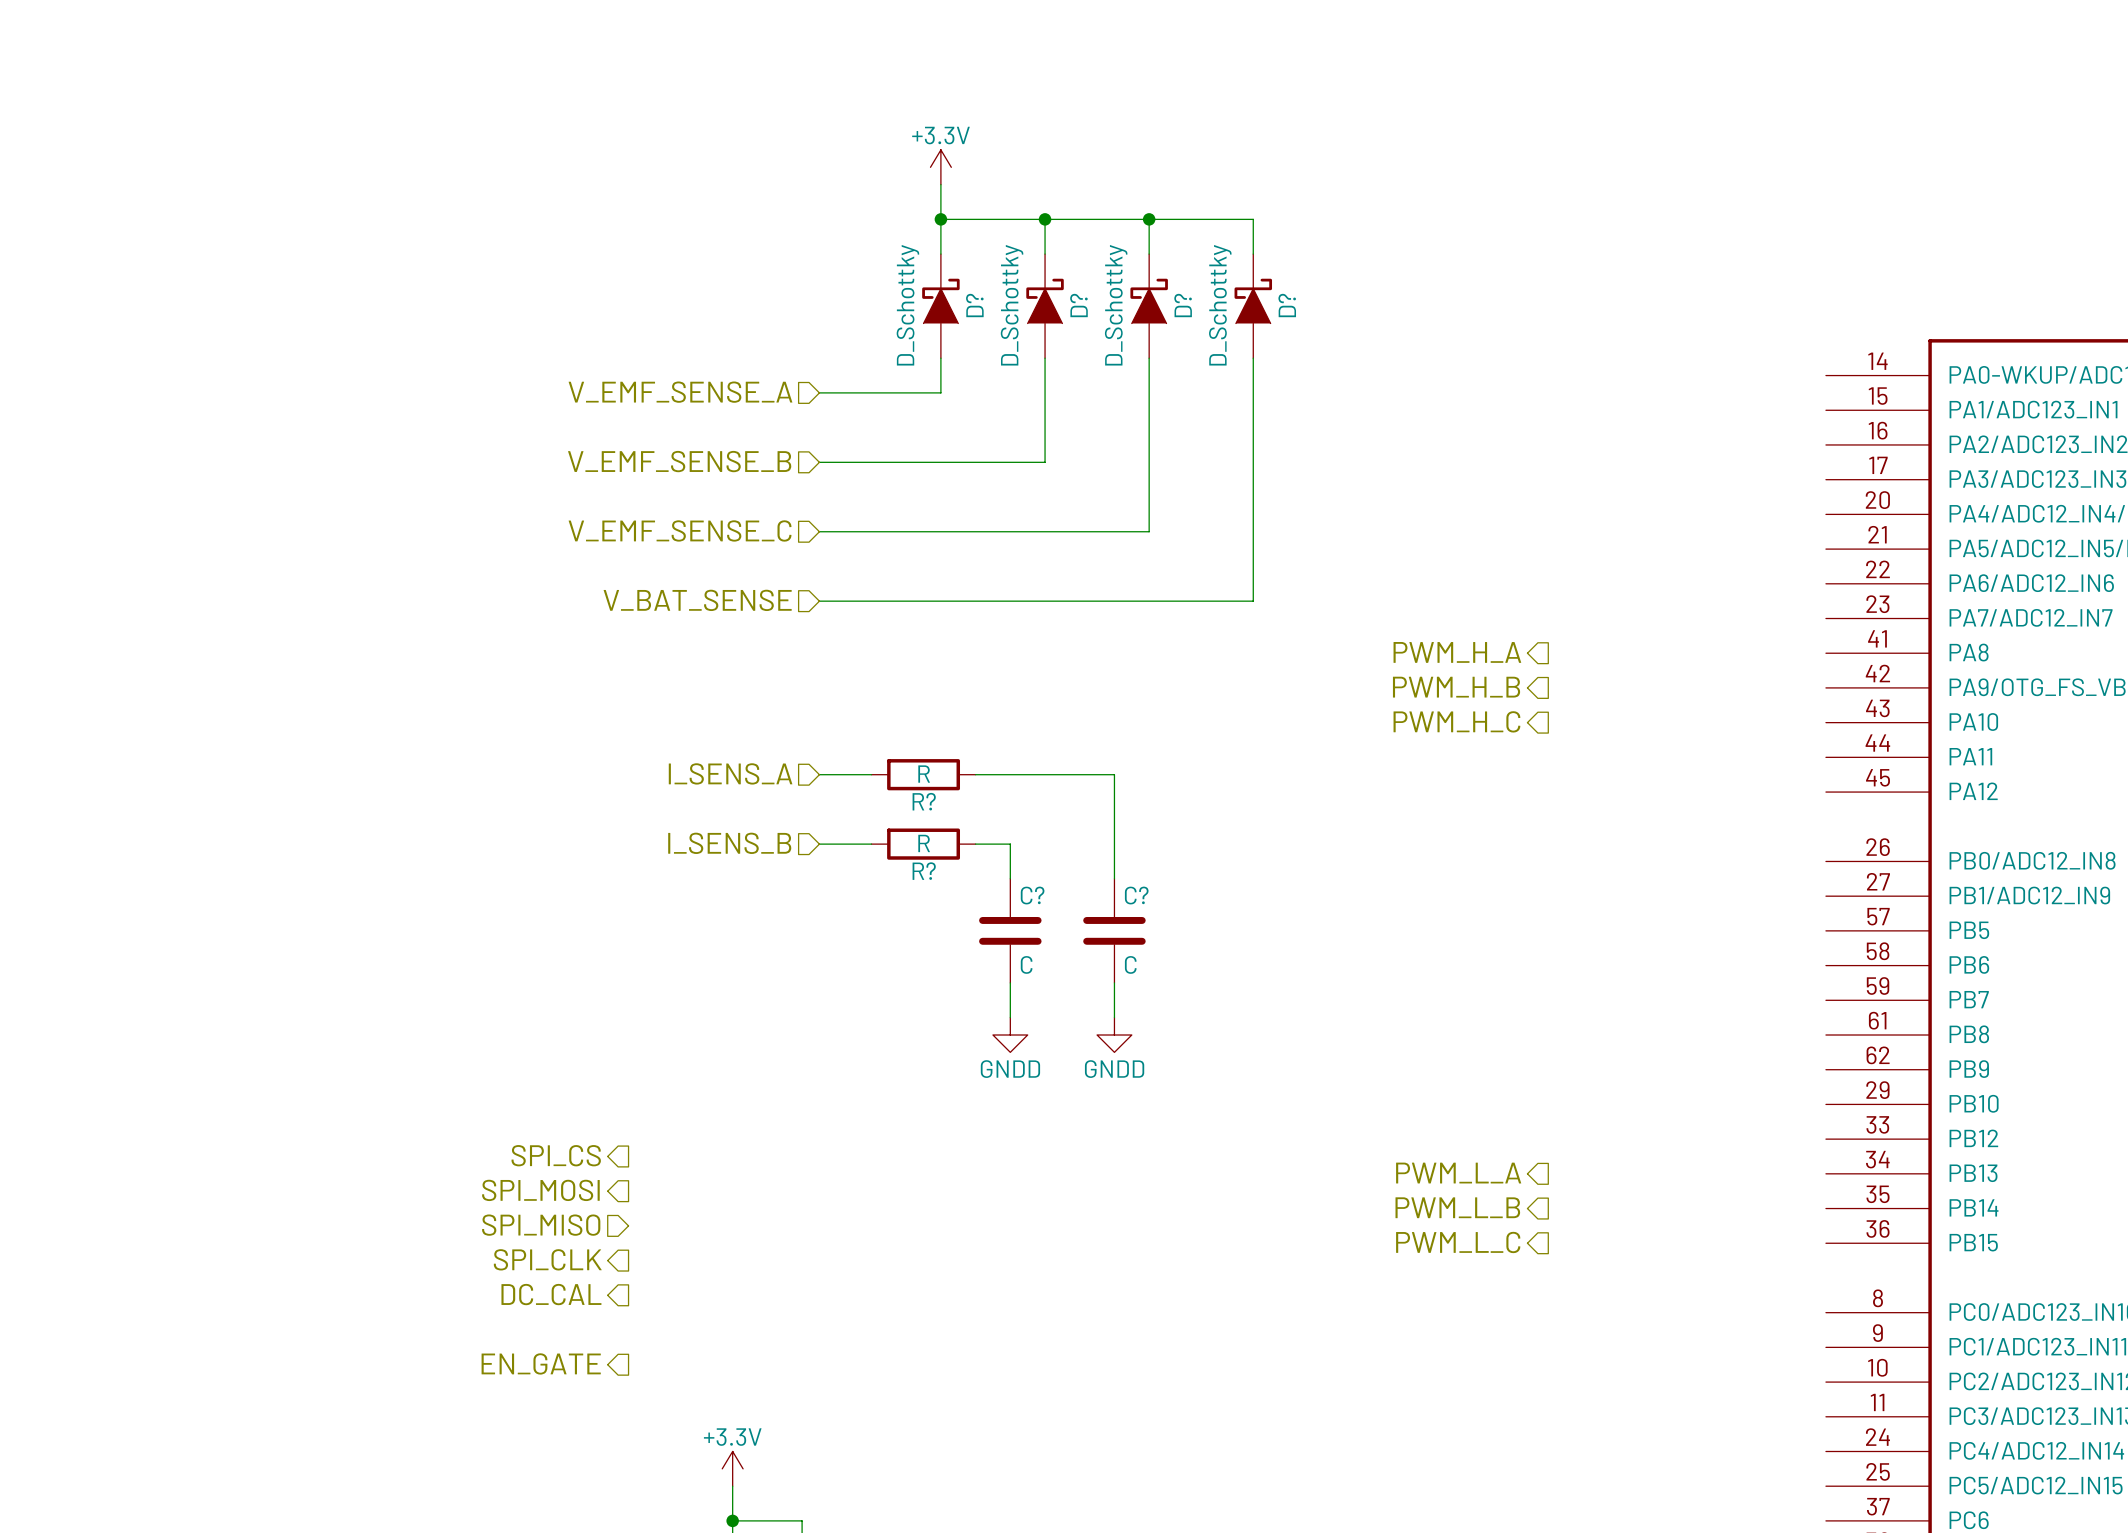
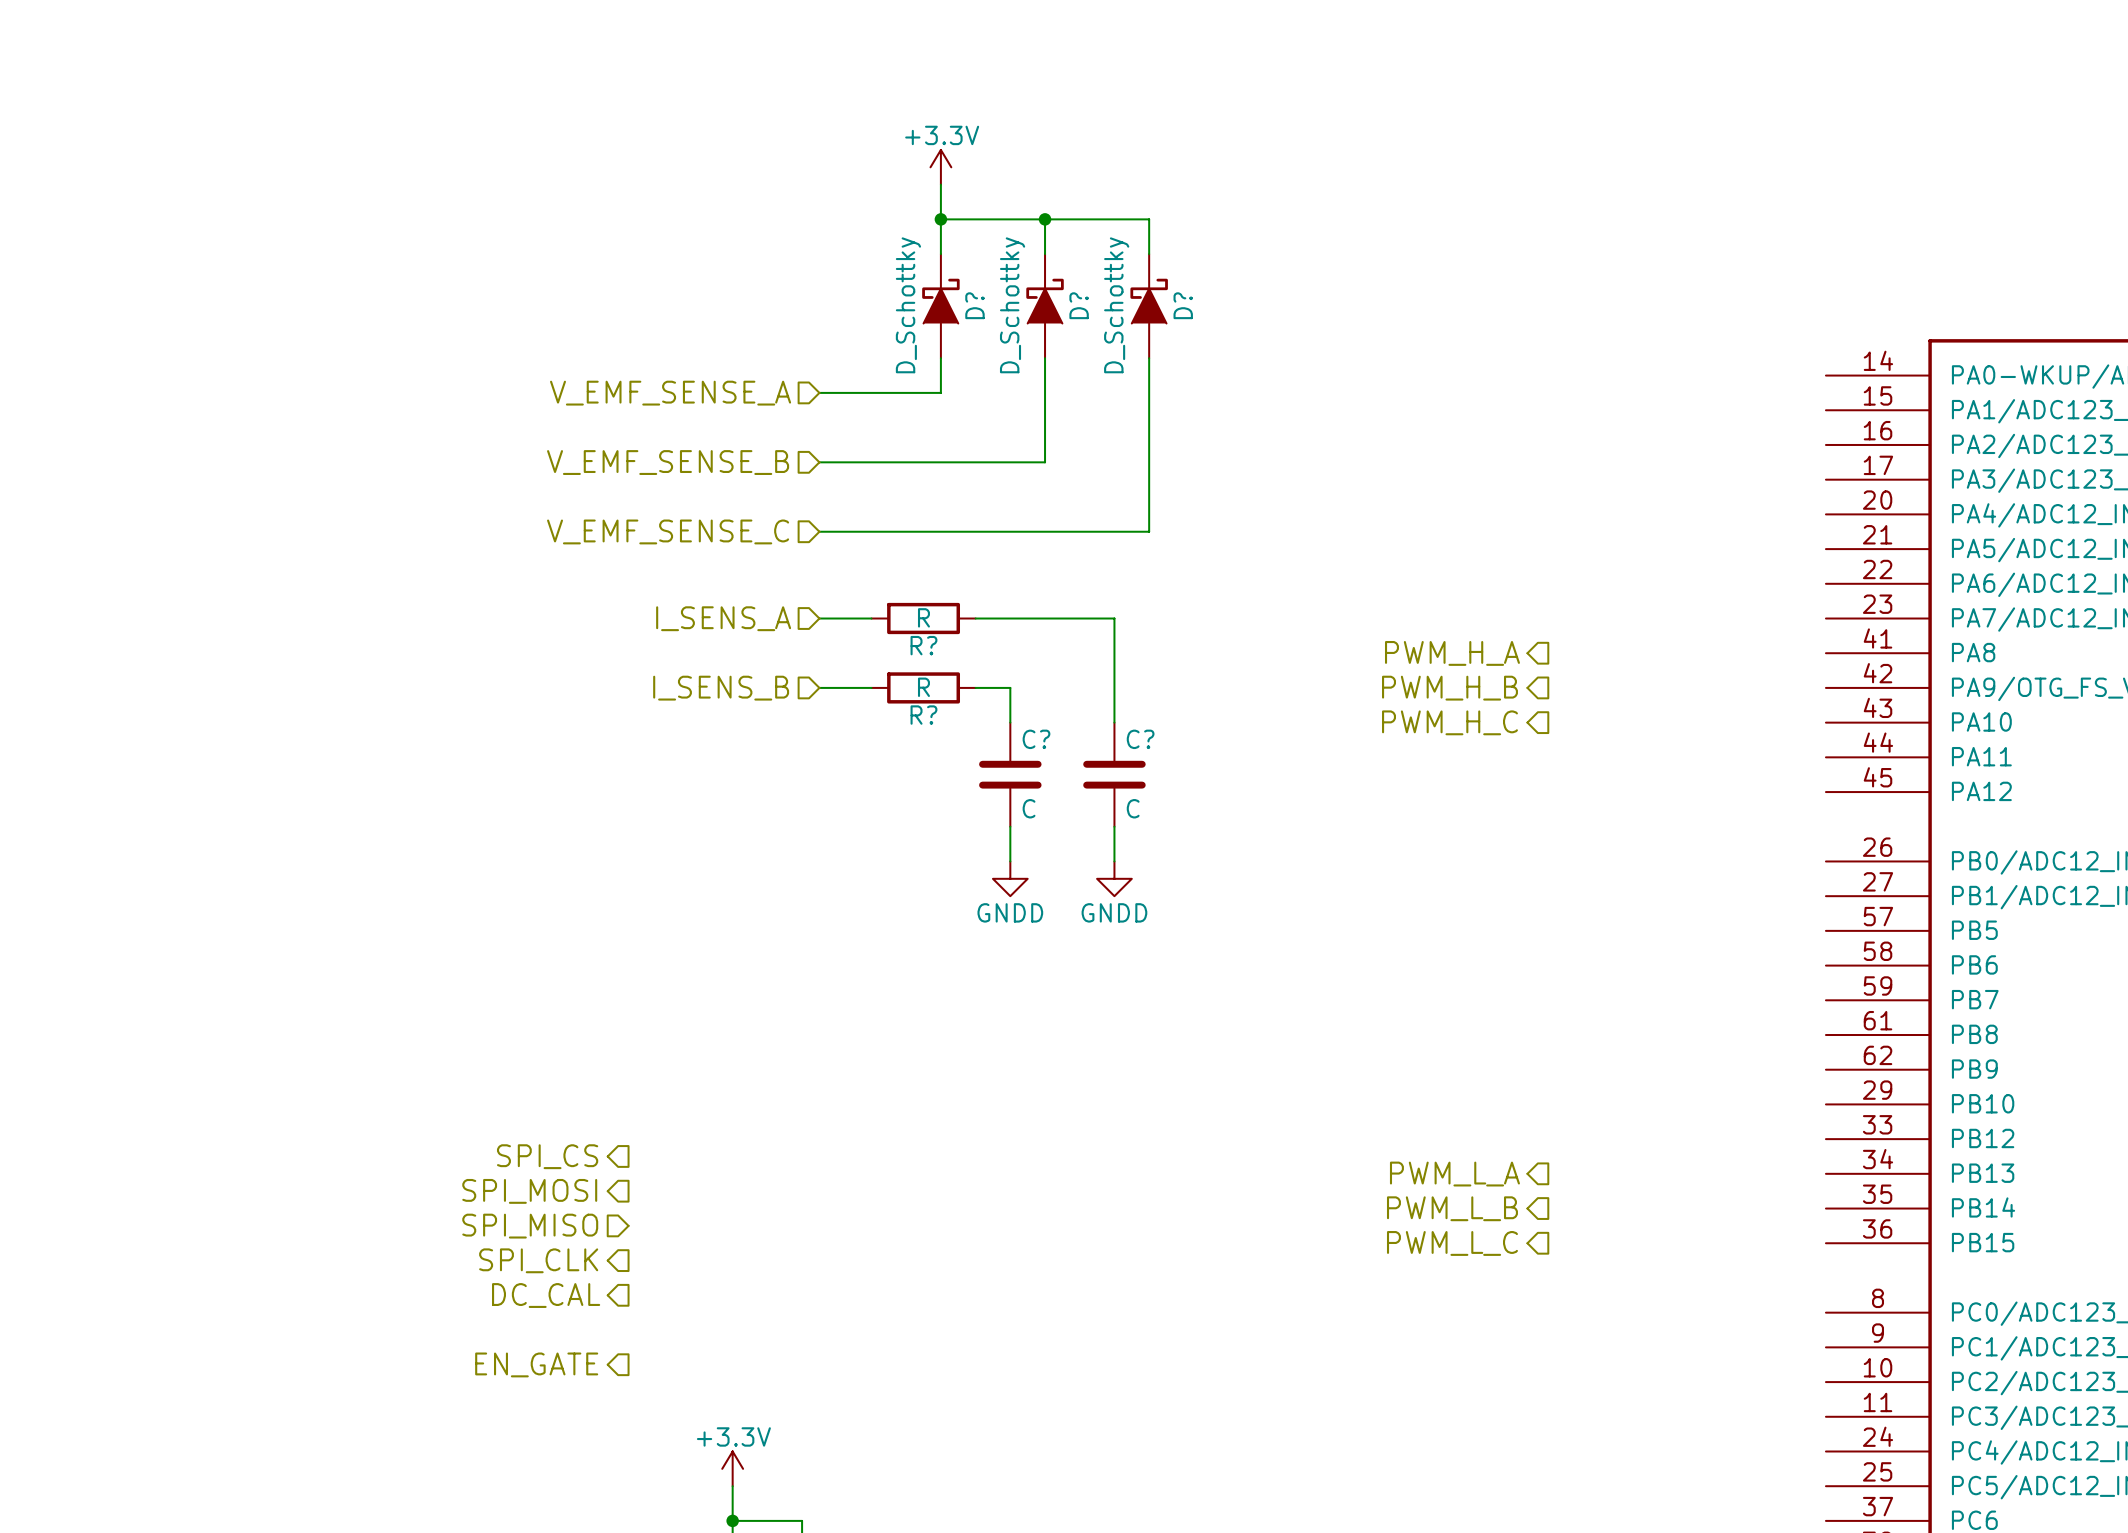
wire: (1149, 219) (1253, 219) (1253, 254) -> none
junction: (1149, 219) -> none
D?: D_Schottky (1253, 306) -> none
wire: (1253, 358) (1253, 601) (819, 601) -> none
hierarchical label: V_BAT_SENSE (697, 600) -> none
R?: none -> R (923, 618)
wire: none -> (975, 618) (1114, 618) (1114, 722)
R?: none -> R (923, 687)
wire: none -> (975, 687) (1010, 687) (1010, 722)
hierarchical label position: I_SENS_A (730, 773) -> I_SENS_A (723, 618)
wire: (819, 774) (871, 774) -> (819, 618) (871, 618)
R?: R (923, 774) -> none
wire: (975, 774) (1114, 774) (1114, 826) -> none
C?: none -> C (1010, 774)
C?: none -> C (1114, 774)
hierarchical label position: I_SENS_B (729, 843) -> I_SENS_B (721, 688)
wire: (819, 844) (871, 844) -> (819, 687) (871, 687)
R?: R (923, 844) -> none
wire: (975, 844) (1010, 844) -> (1010, 826) (1010, 844)
power symbol: none -> GNDD (1010, 878)
power symbol: none -> GNDD (1114, 878)
C?: C (1010, 930) -> none
C?: C (1114, 930) -> none
wire: (1010, 982) (1010, 1017) -> none
wire: (1114, 982) (1114, 1017) -> none
power symbol: GNDD (1010, 1035) -> none
power symbol: GNDD (1114, 1035) -> none

